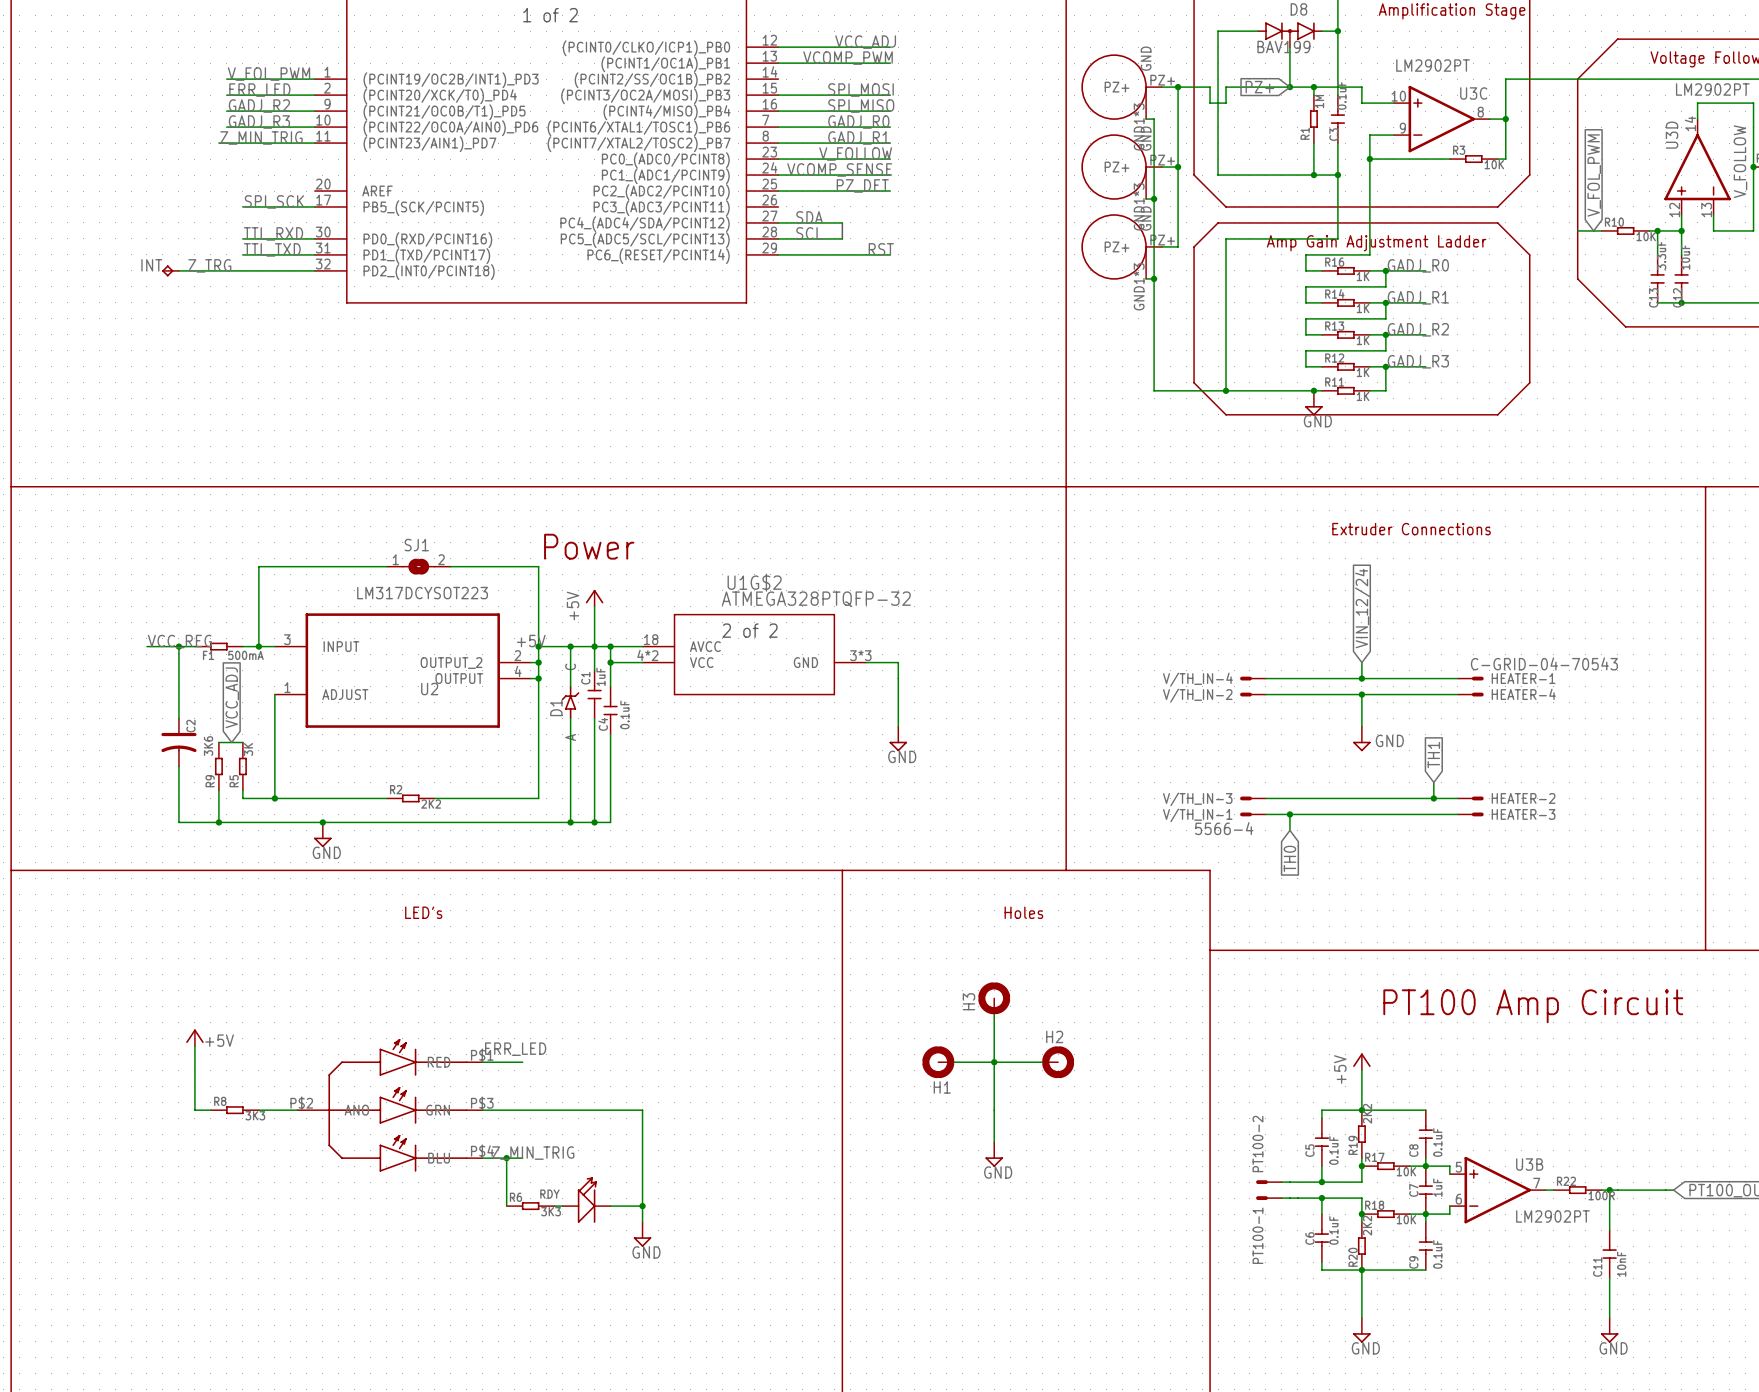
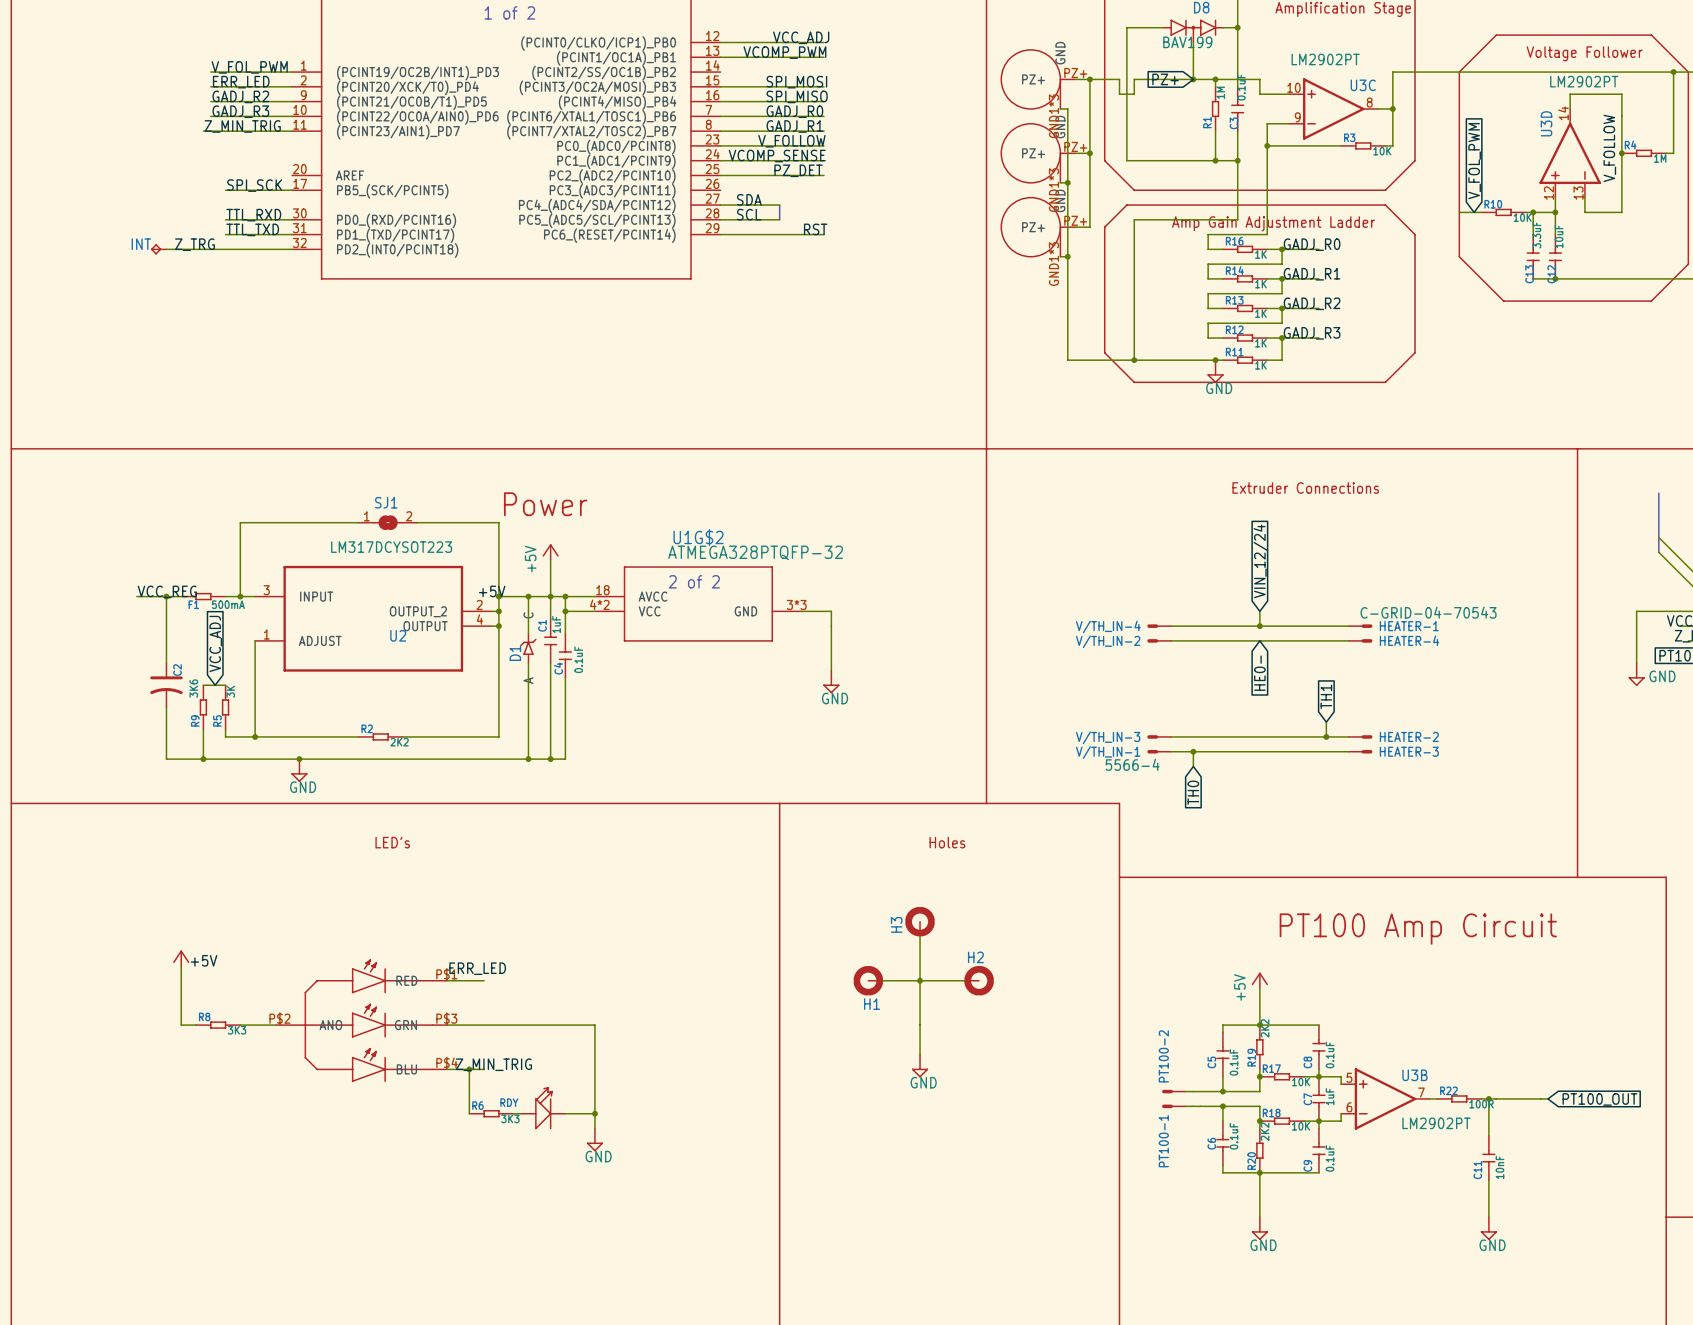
wire: (1361, 694) (1361, 726) -> none
junction: (1361, 694) -> none
global label: none -> HE0- (1259, 673)
power symbol: GND (1361, 738) -> none

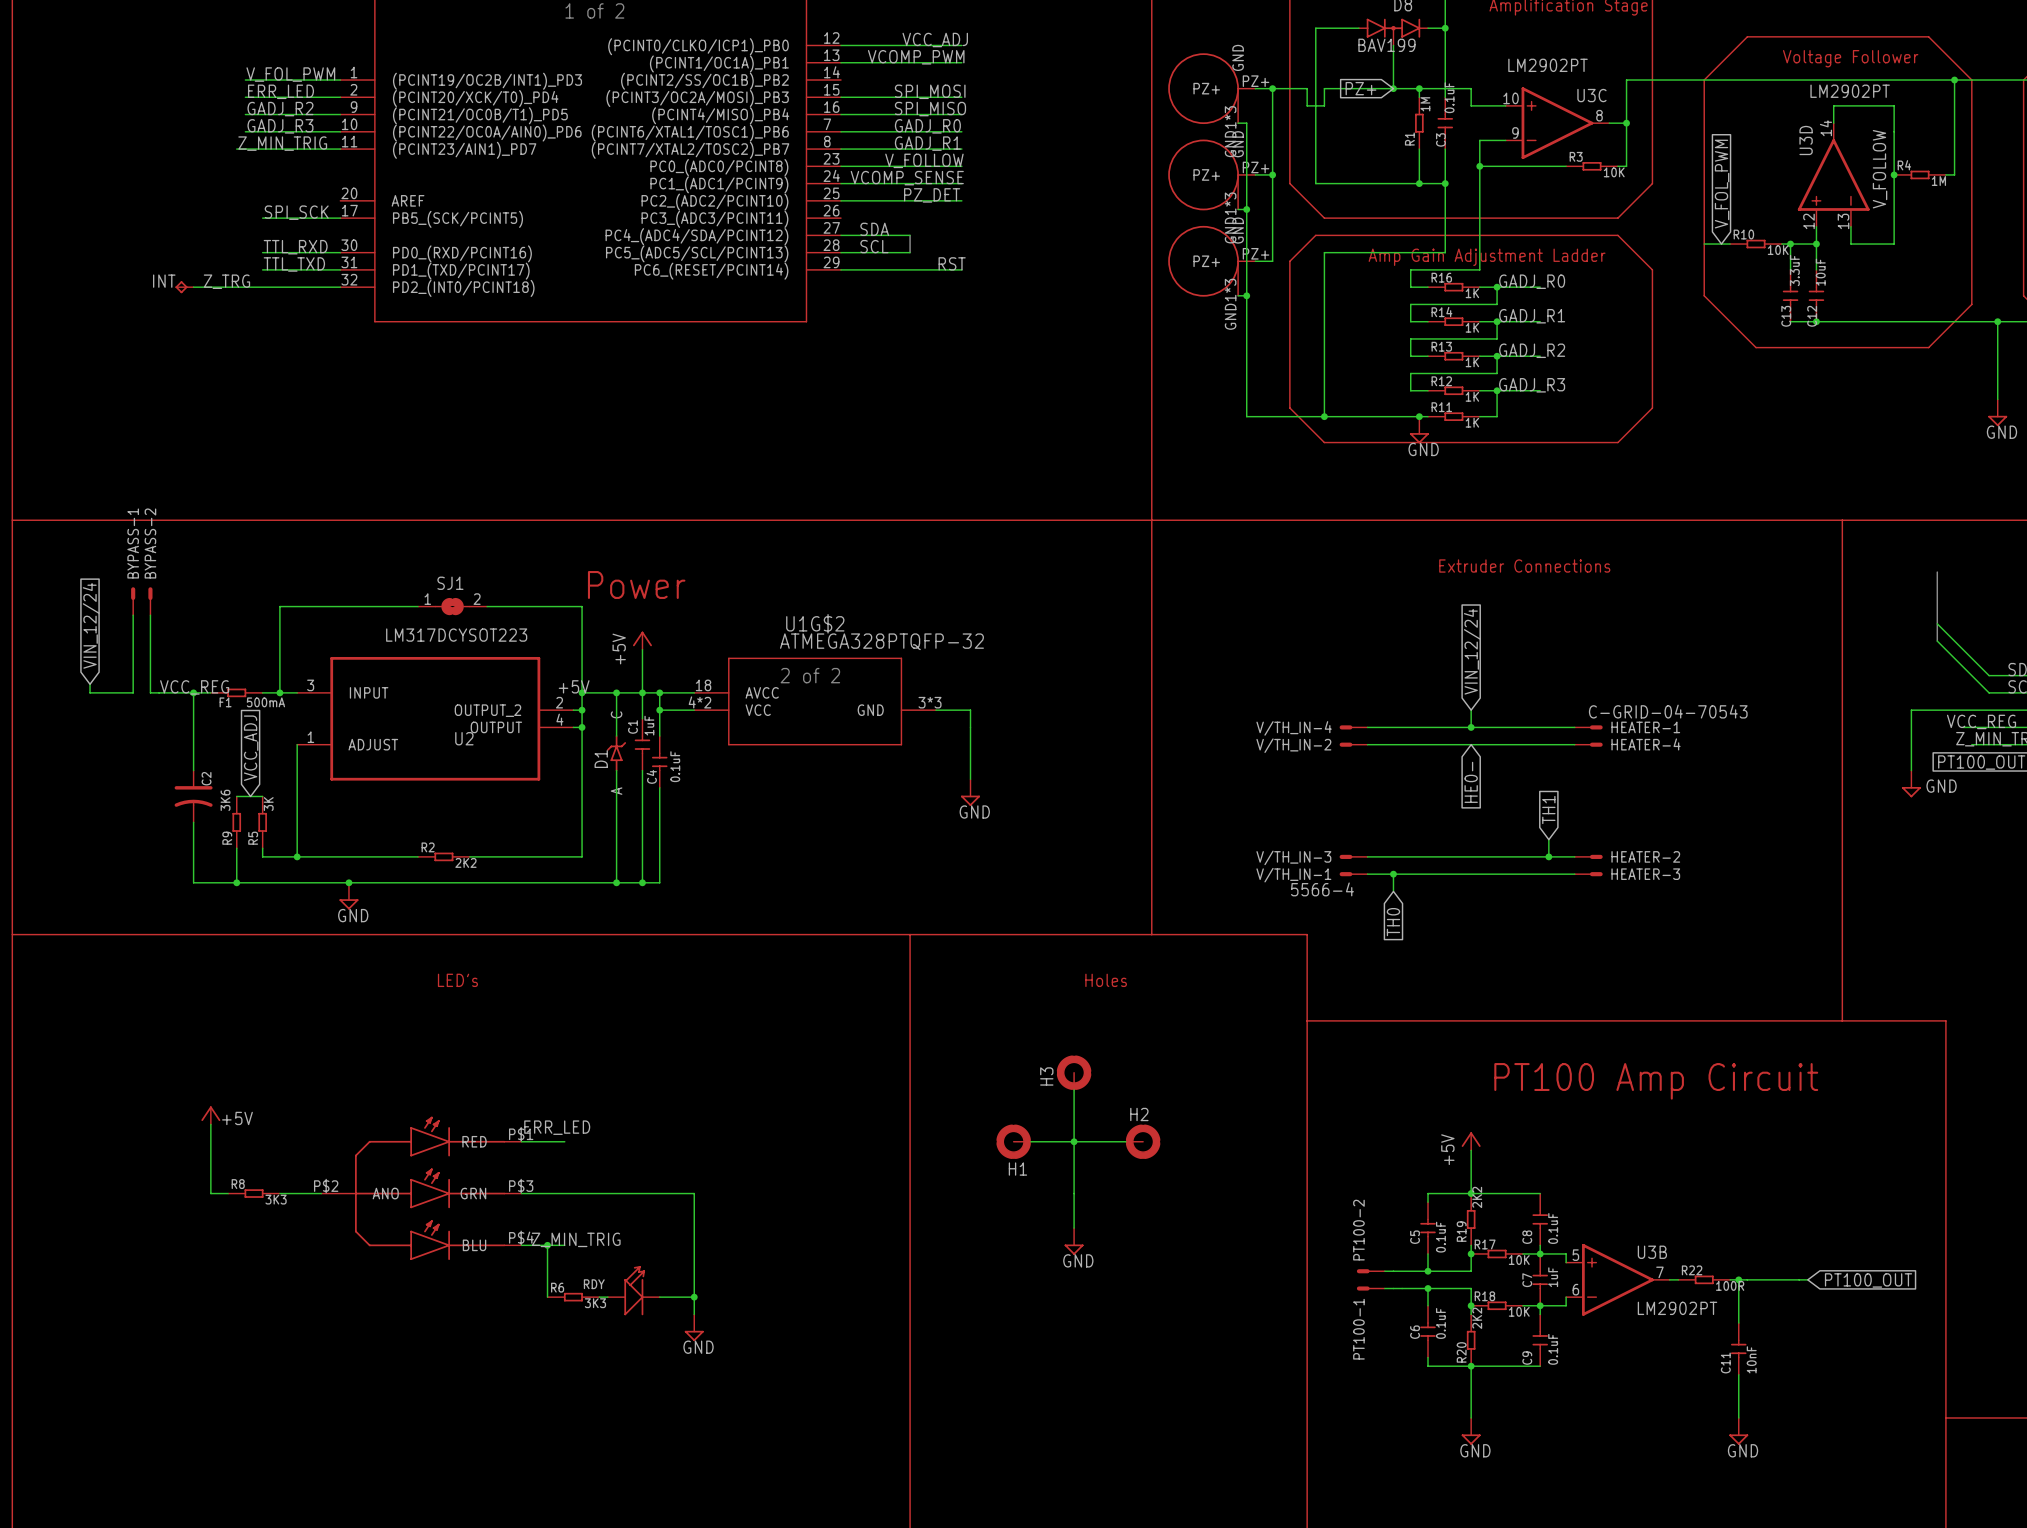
BYPASS-1: none -> (133, 601)
BYPASS-2: none -> (150, 601)
wire: none -> (133, 615) (133, 692) (90, 692) (90, 684)
wire: none -> (150, 615) (150, 692) (159, 692)
global label: none -> VIN_12/24 (91, 625)

